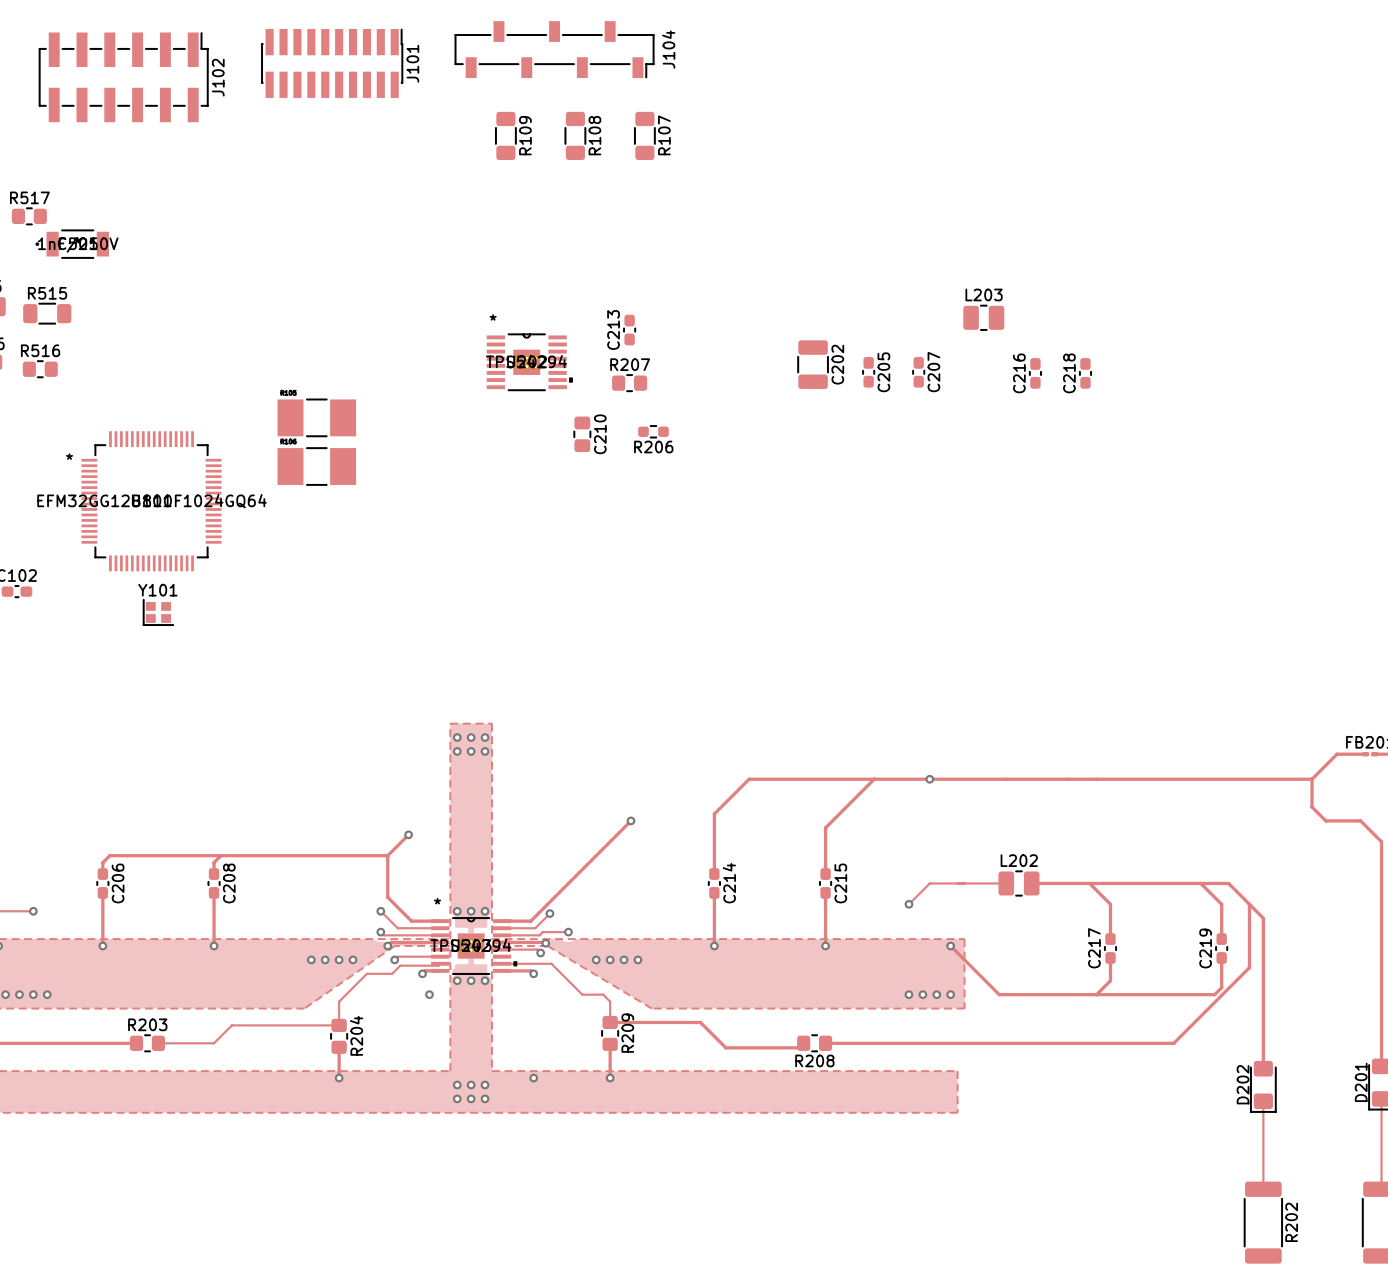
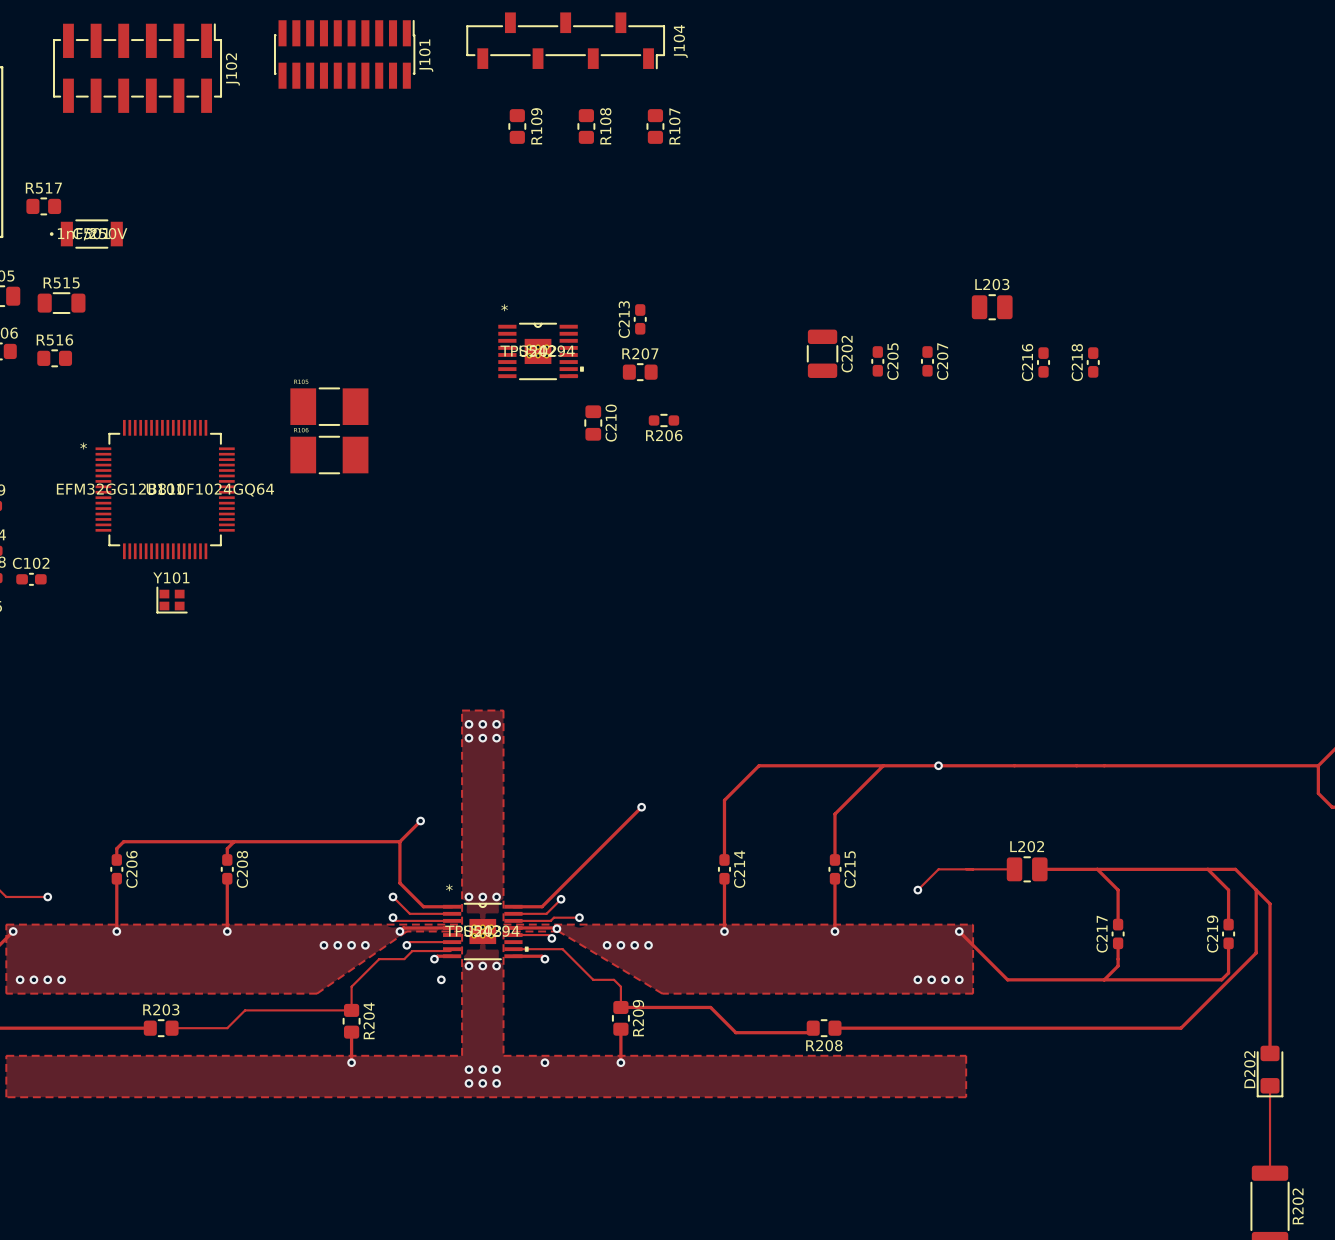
R109 footprint: [495, 111, 517, 160] -> [508, 109, 526, 144]
R108 footprint: [564, 111, 587, 160] -> [577, 109, 596, 144]
R107 footprint: [634, 111, 656, 160] -> [646, 109, 665, 144]

